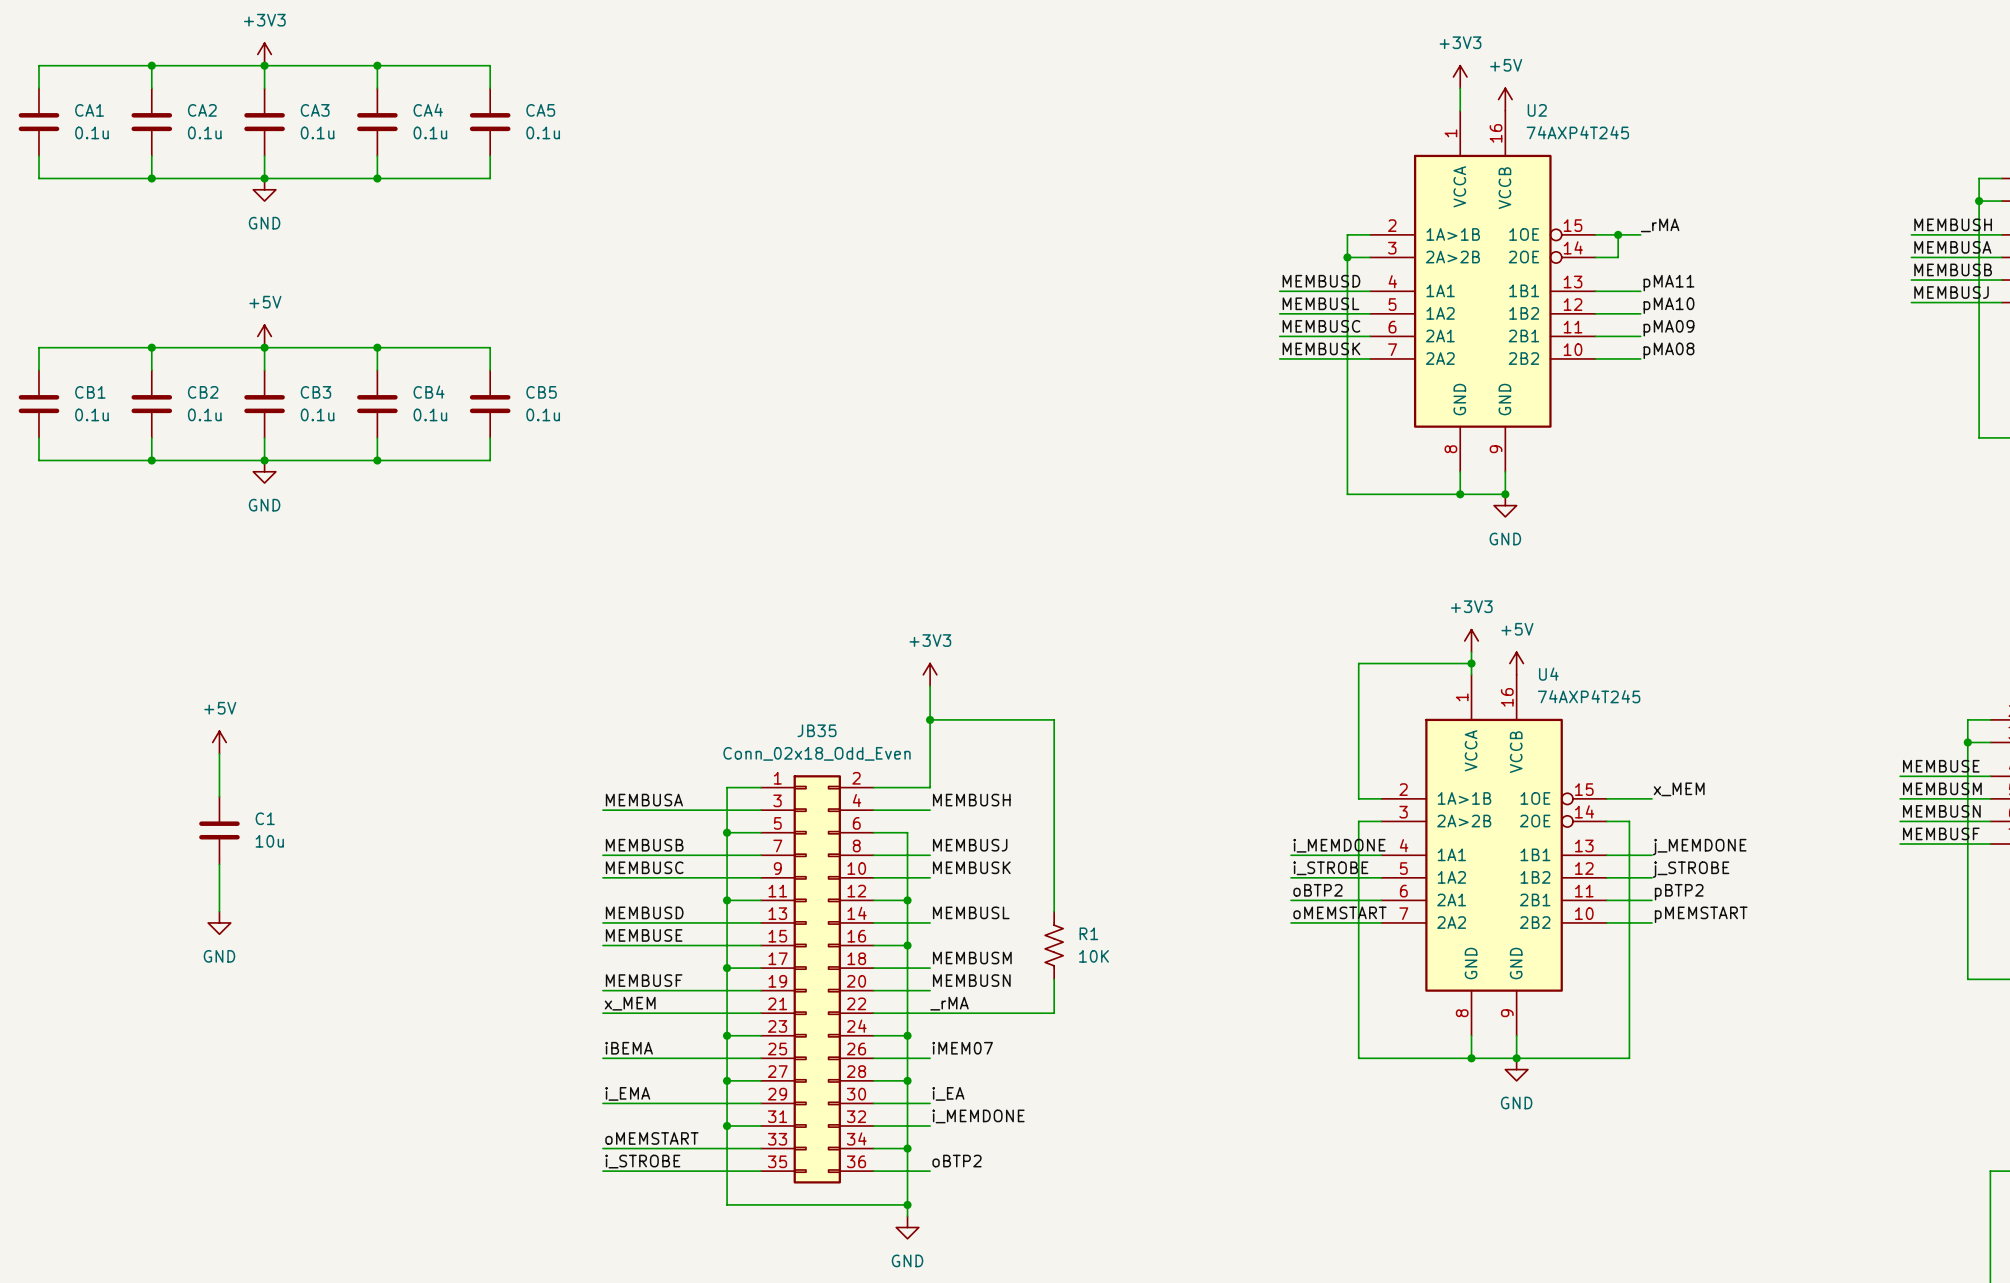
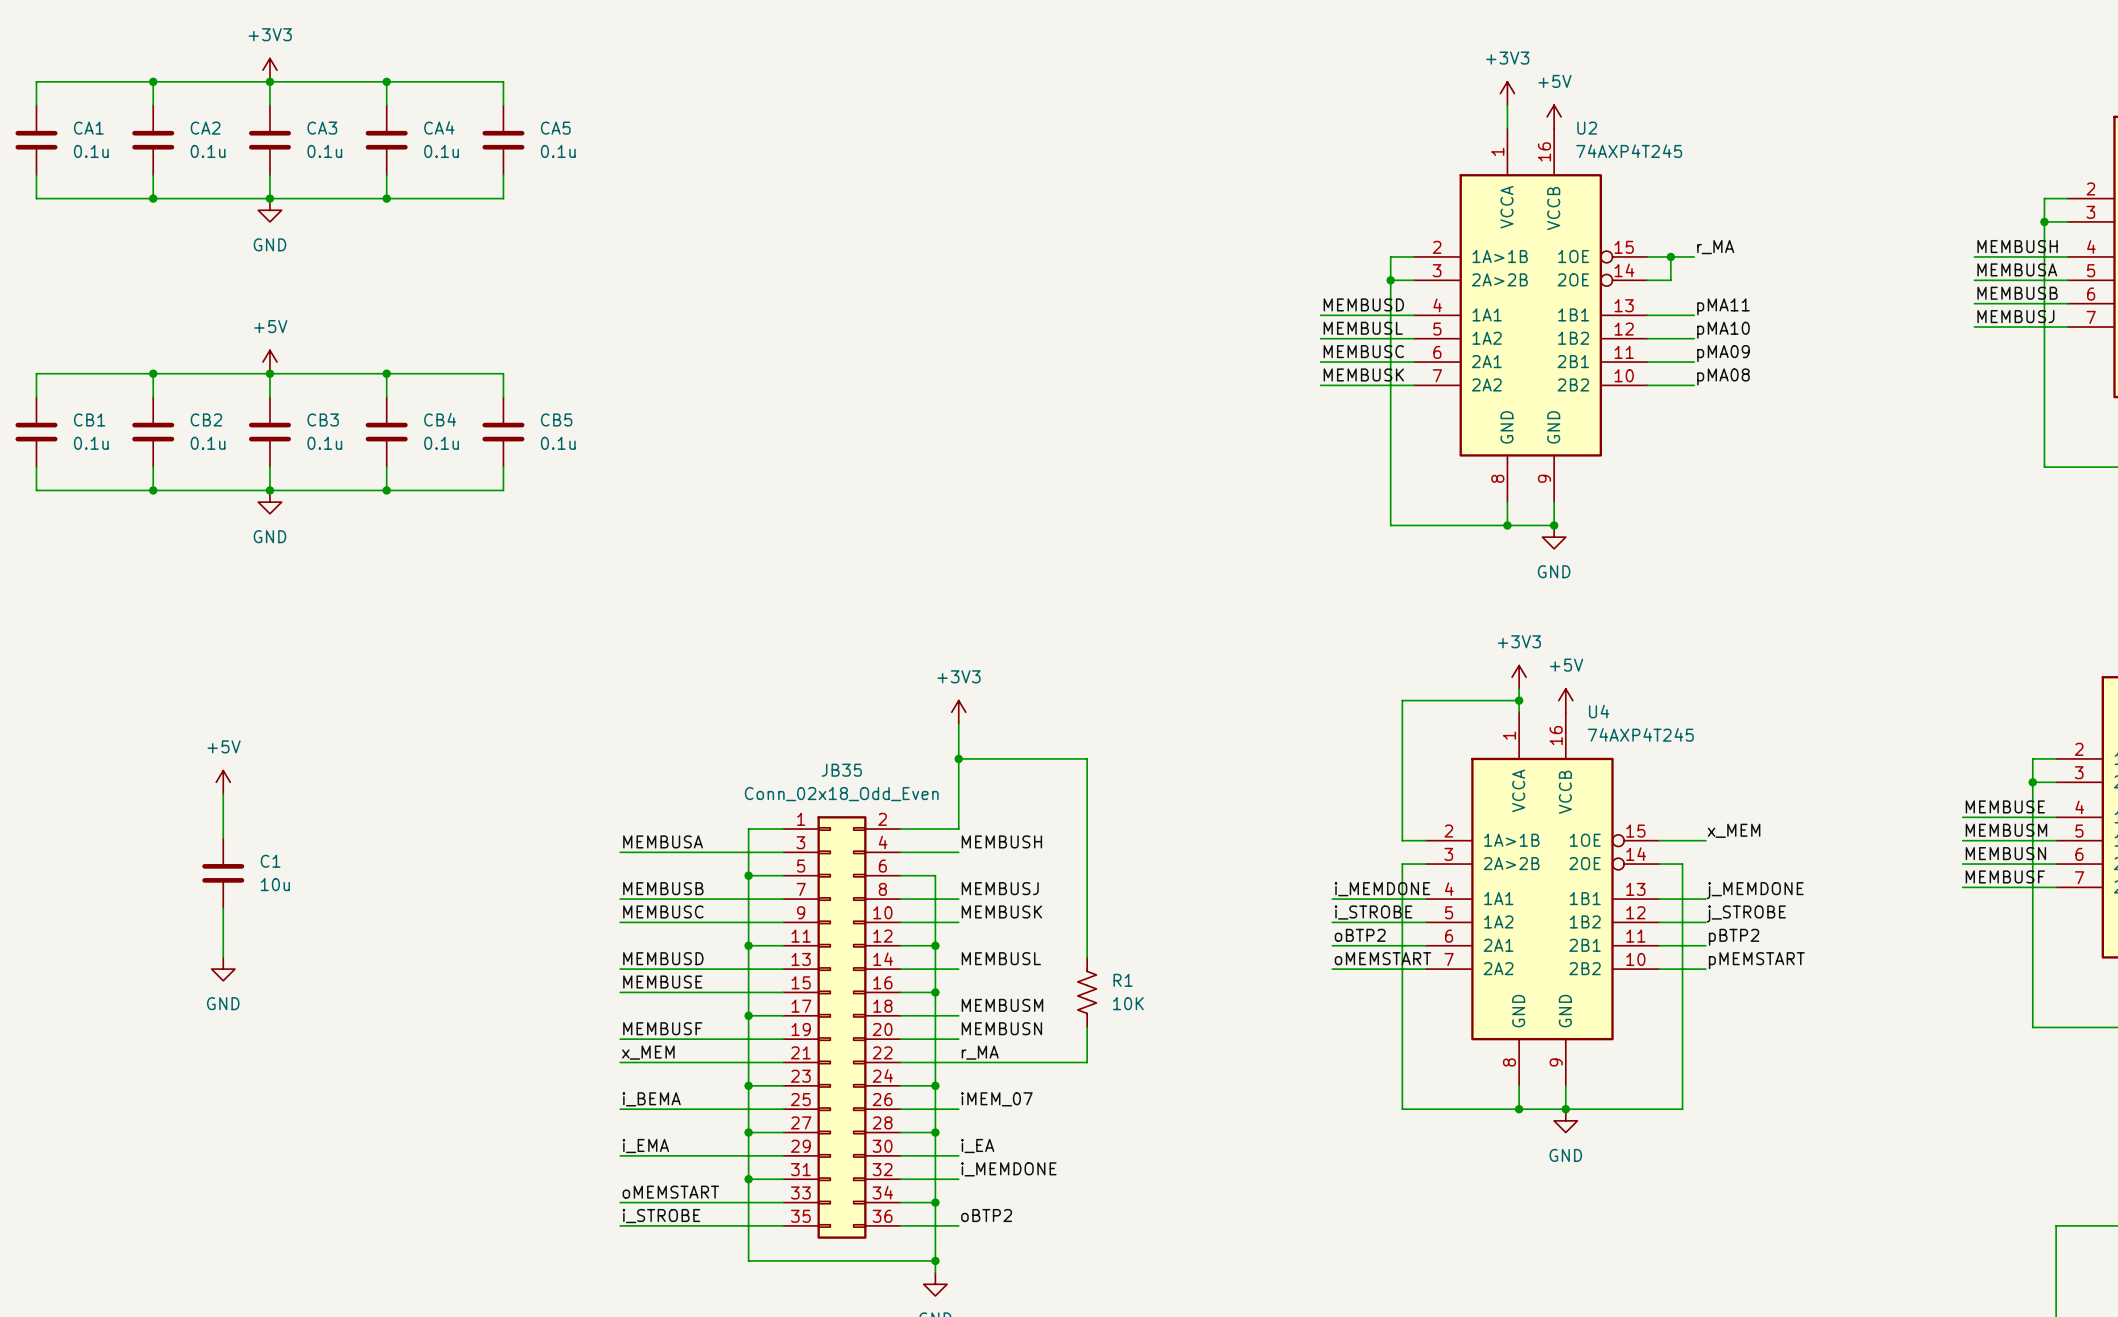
label: _rMA (1660, 225) -> r_MA (1715, 247)
label: _rMA (949, 1003) -> r_MA (980, 1052)
label: iBEMA (629, 1048) -> i_BEMA (651, 1099)
label: iMEM07 (962, 1048) -> iMEM_07 (996, 1099)

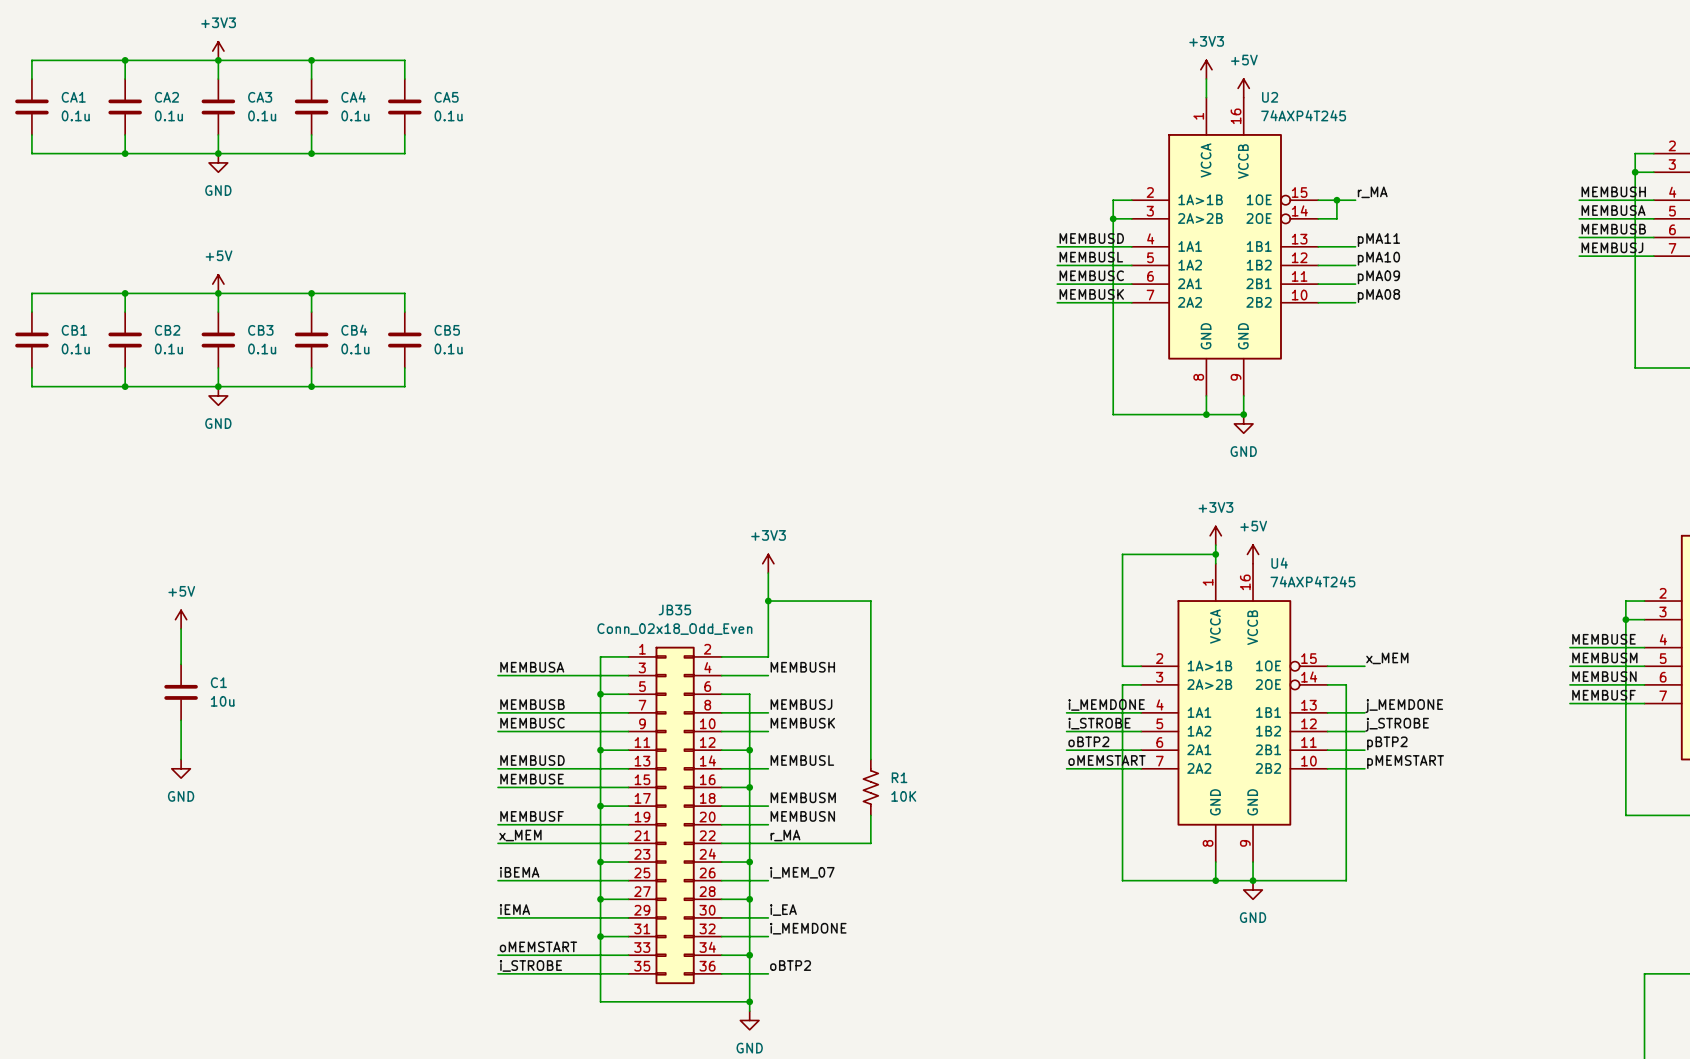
label: i_BEMA (651, 1099) -> iBEMA (519, 872)
label: iMEM_07 (996, 1099) -> i_MEM_07 (802, 872)
label: i_EMA (645, 1146) -> iEMA (514, 909)

